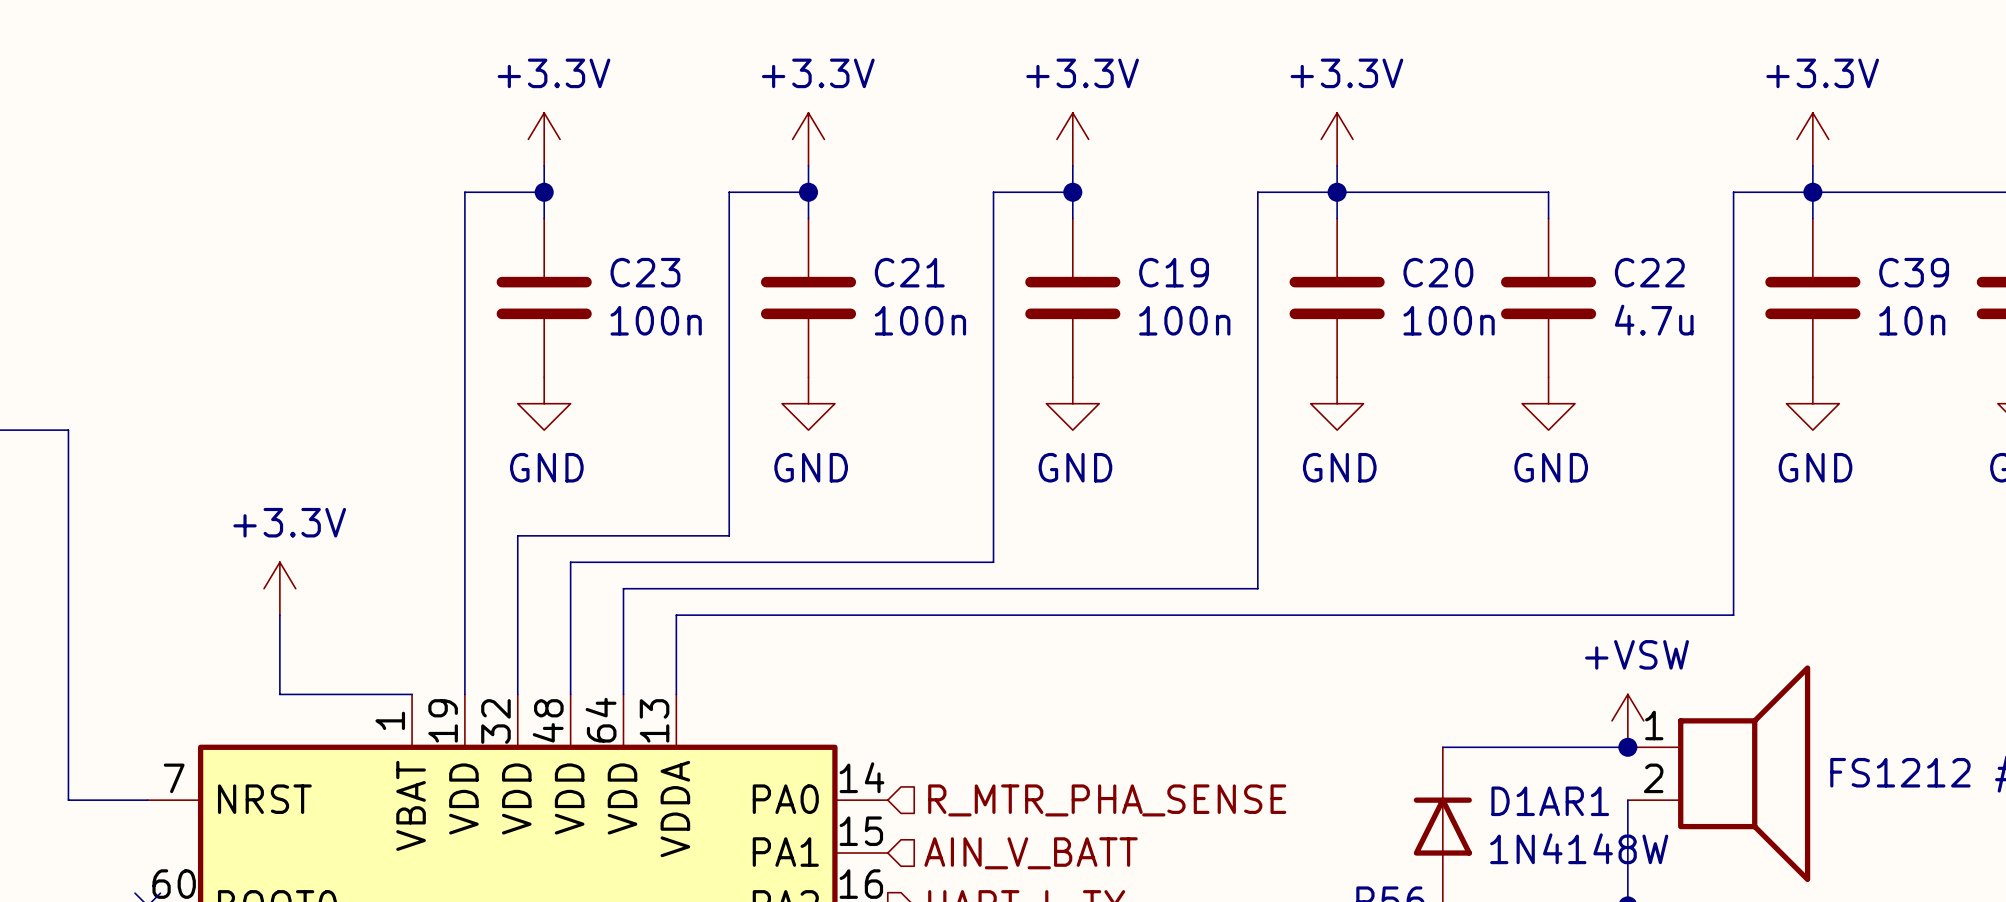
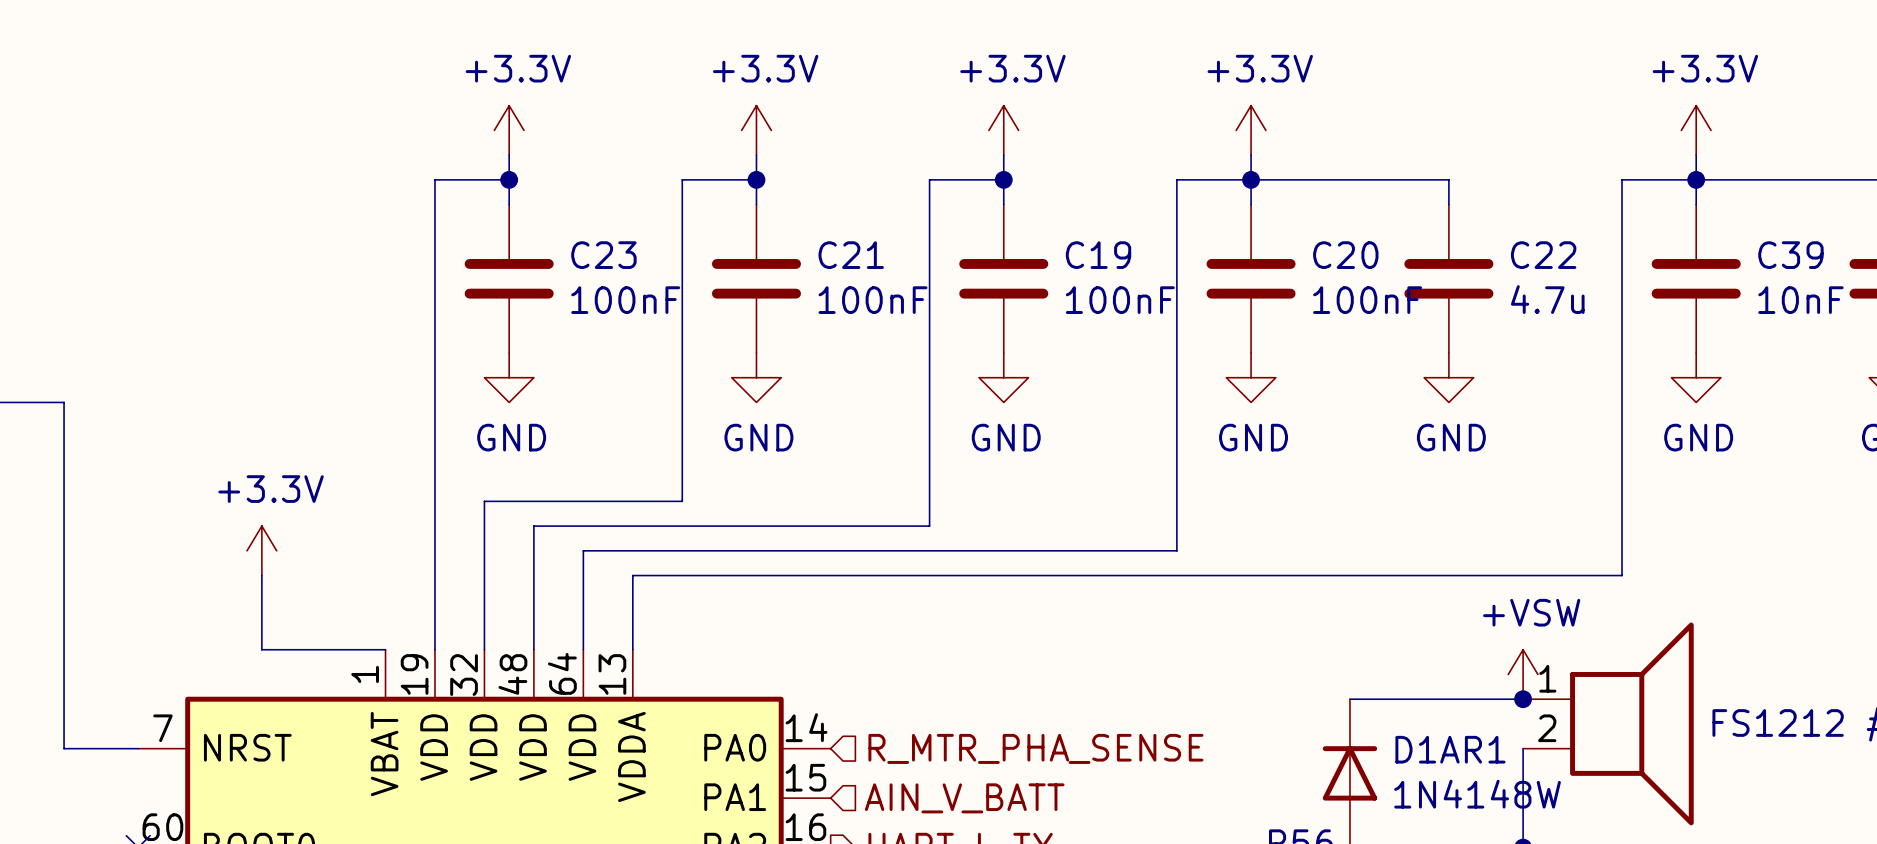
C23 value: 100n (656, 320) -> 100nF (625, 300)
C21 value: 100n (920, 320) -> 100nF (873, 300)
C19 value: 100n (1184, 320) -> 100nF (1120, 300)
C20 value: 100n (1449, 320) -> 100nF (1367, 300)
C39 value: 10n (1912, 320) -> 10nF (1800, 300)

